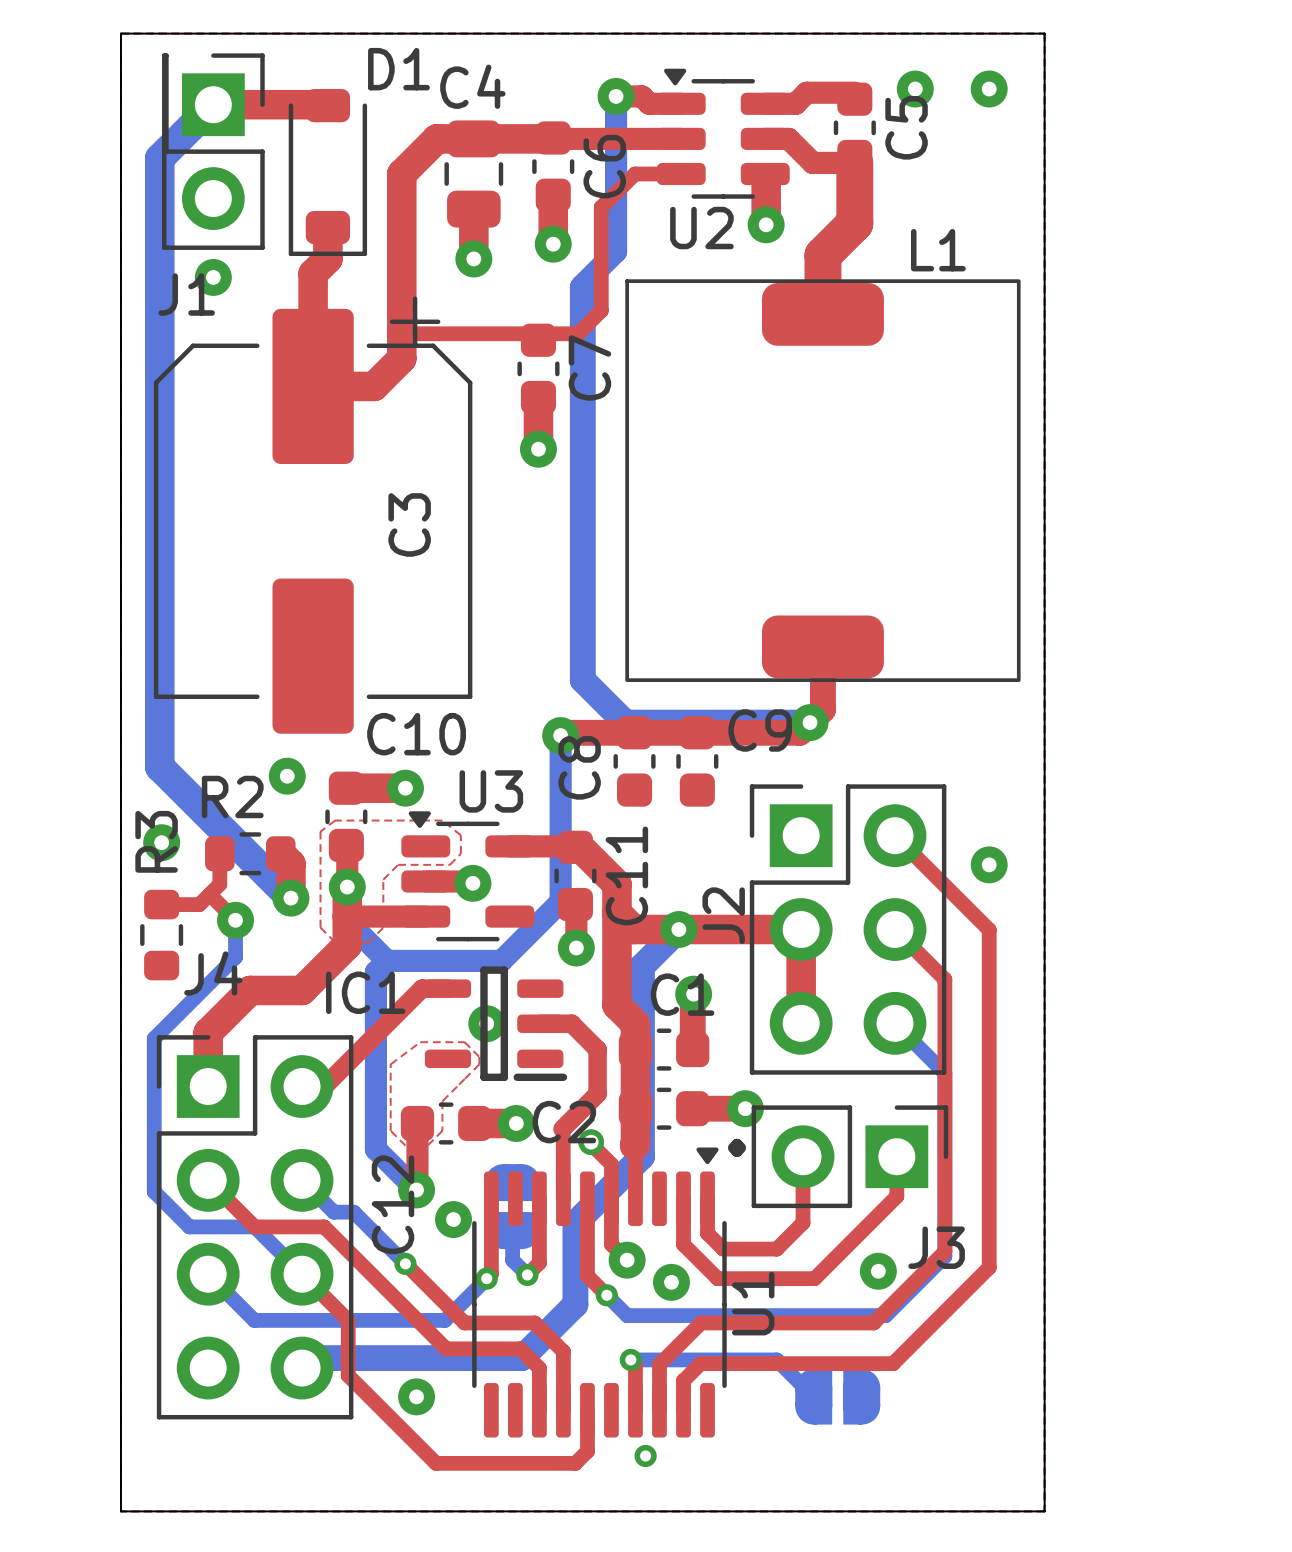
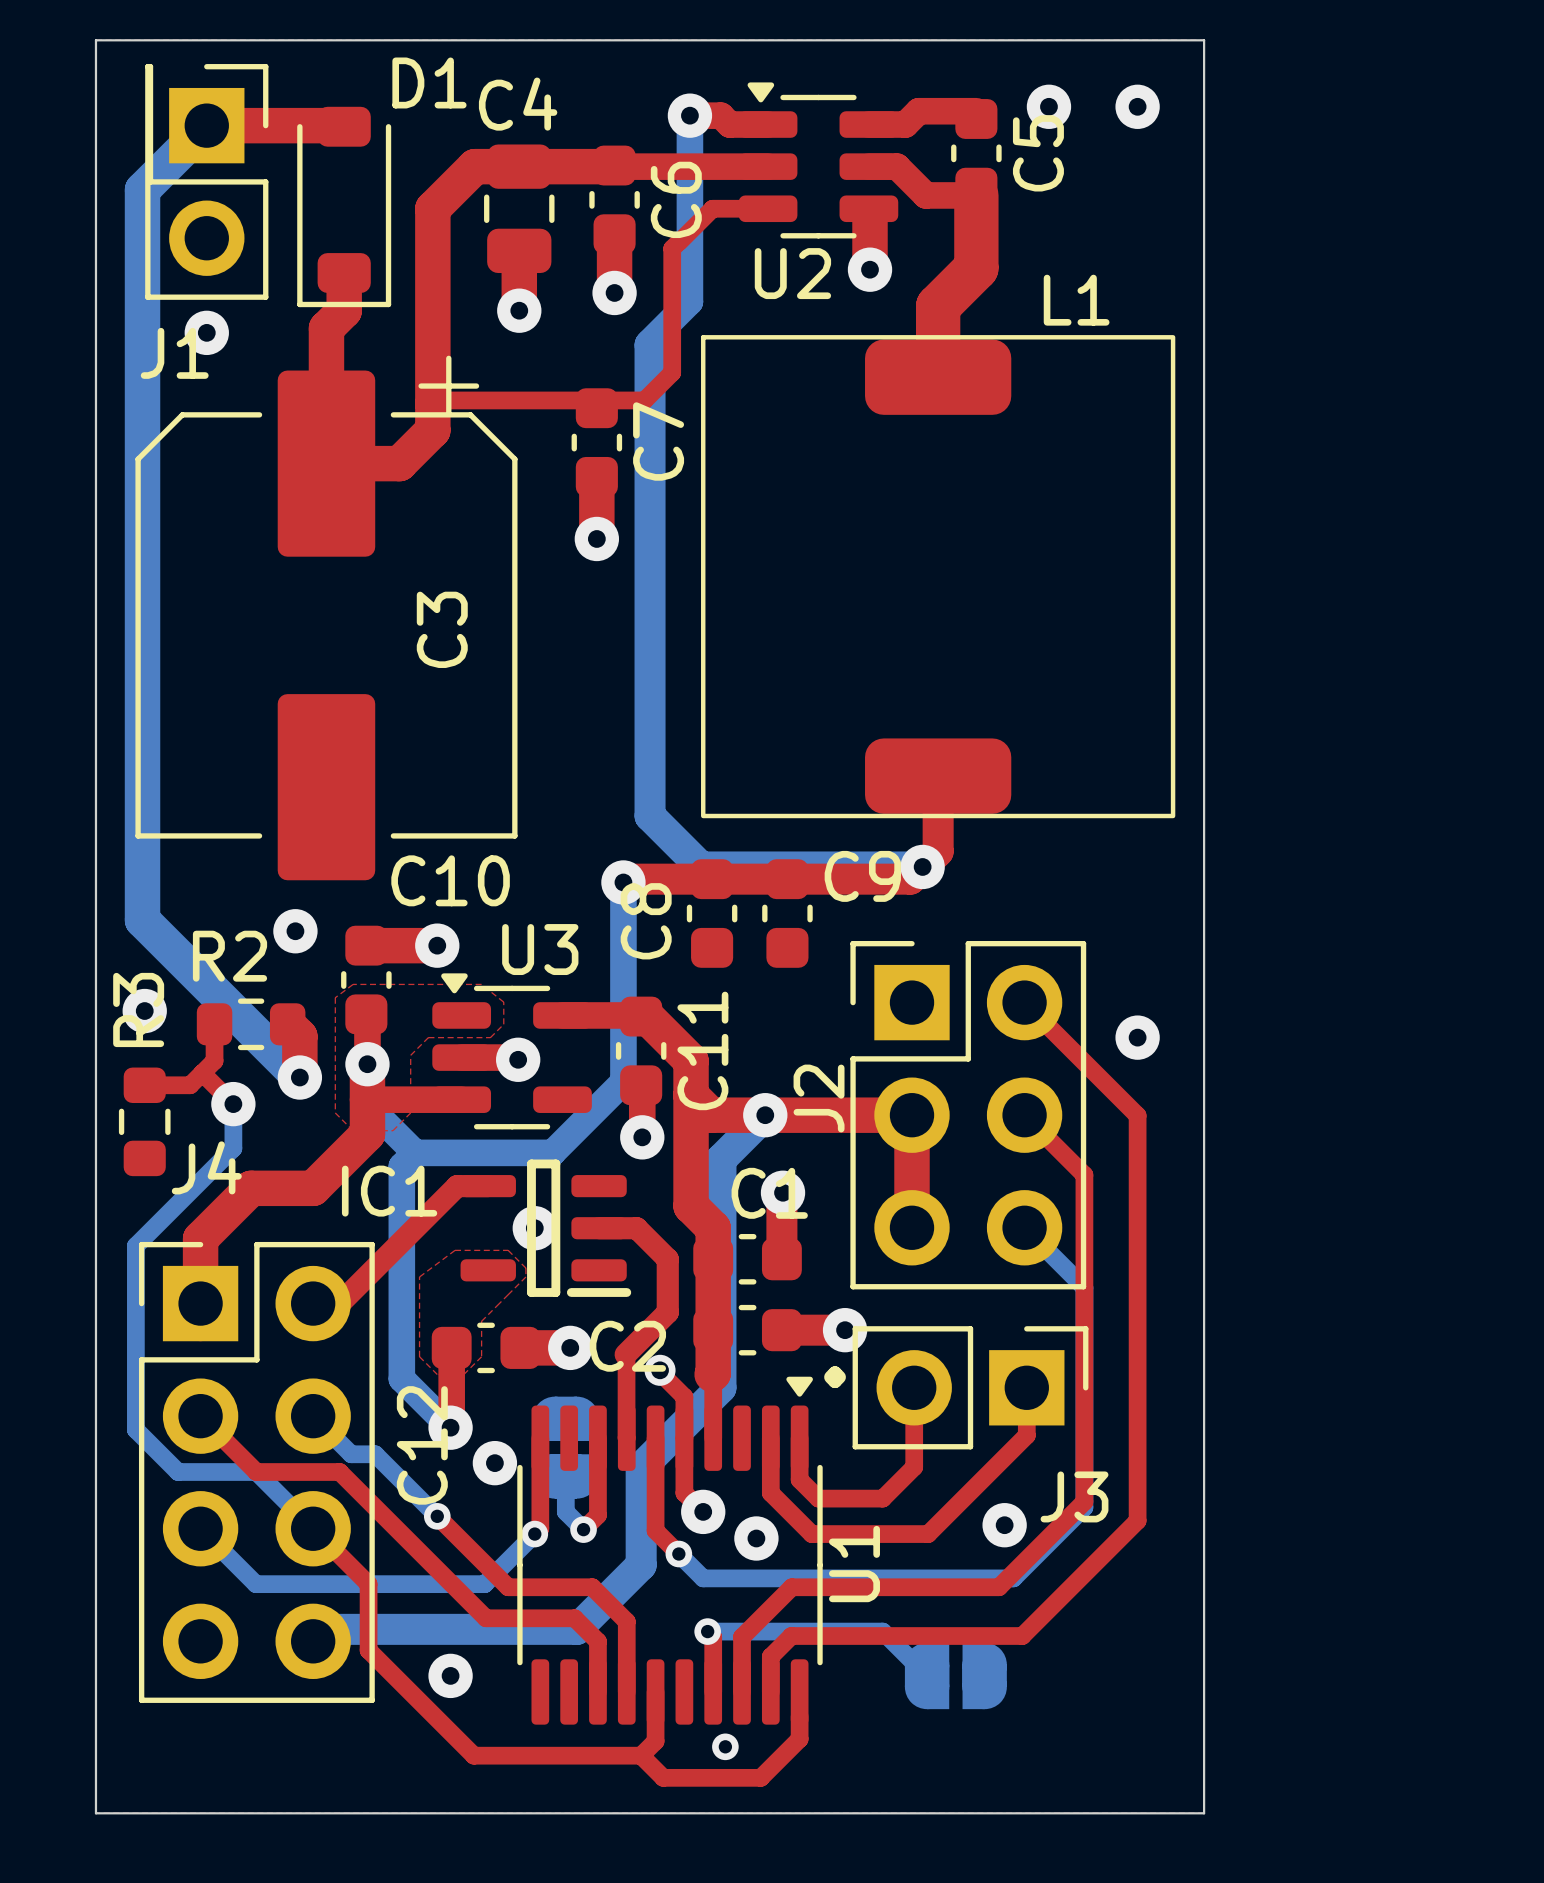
top track: none -> (799, 1716) (799, 1739) (760, 1777) (663, 1777) (641, 1755)

